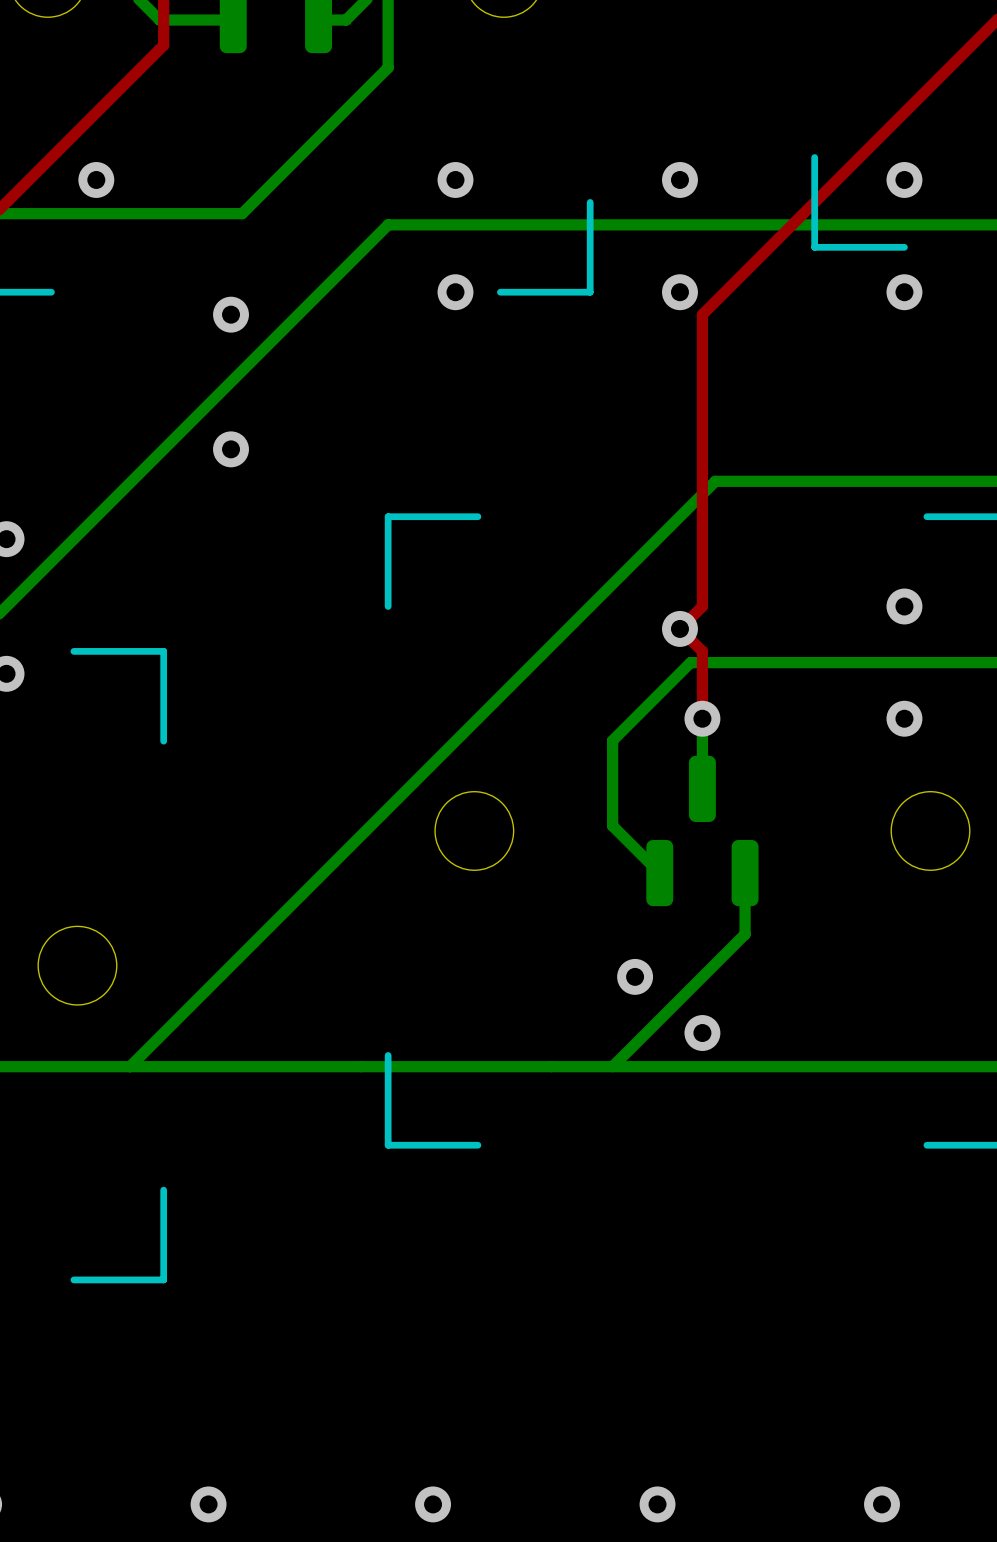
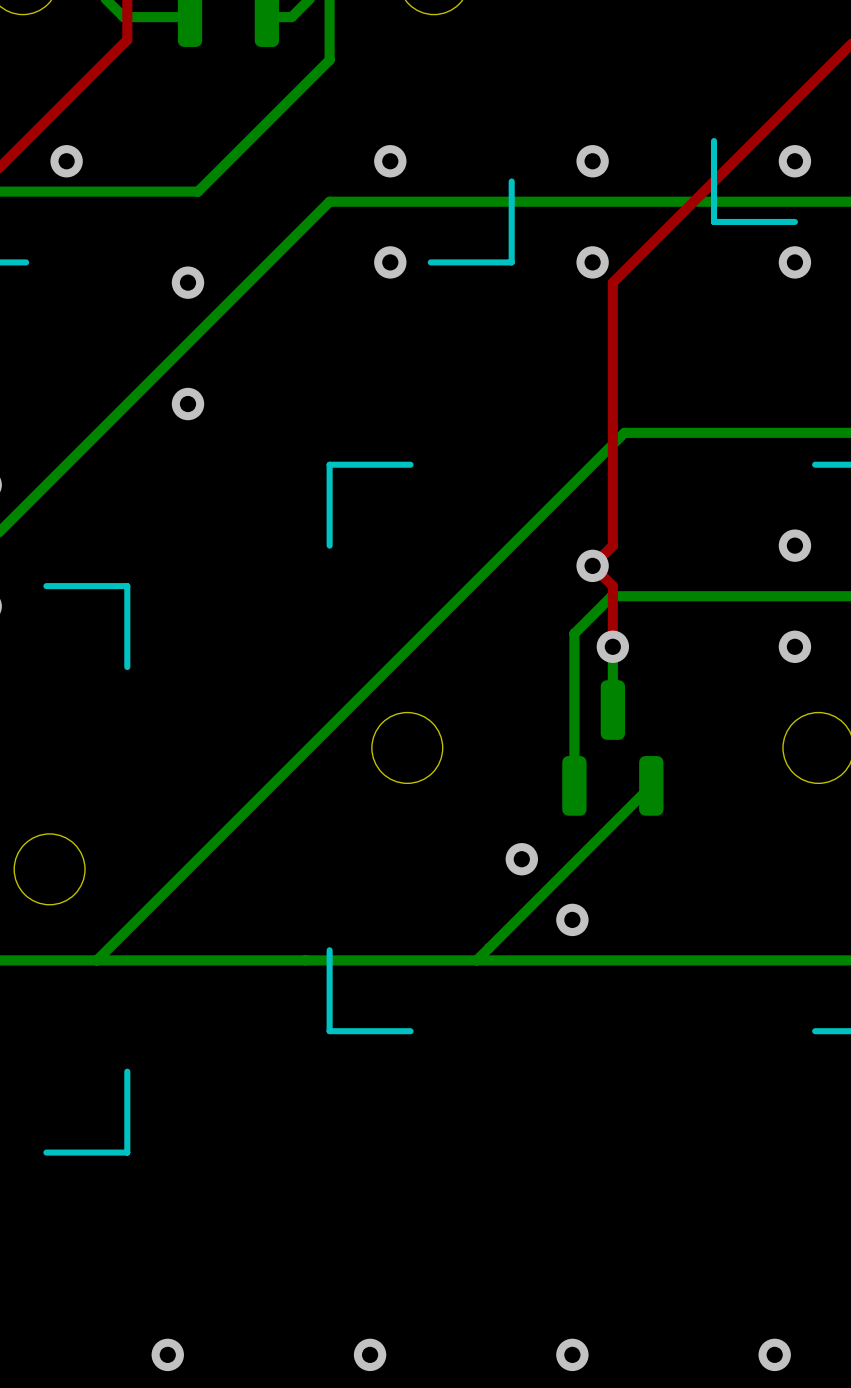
bottom track: (701, 662) (690, 662) (612, 740) (612, 825) (659, 873) -> (611, 596) (574, 633) (574, 785)
bottom track: (745, 873) (745, 934) (612, 1066) -> (651, 785) (476, 960)
via position: (635, 976) -> (521, 859)
via: none -> (572, 919)
via: (702, 1033) -> none

